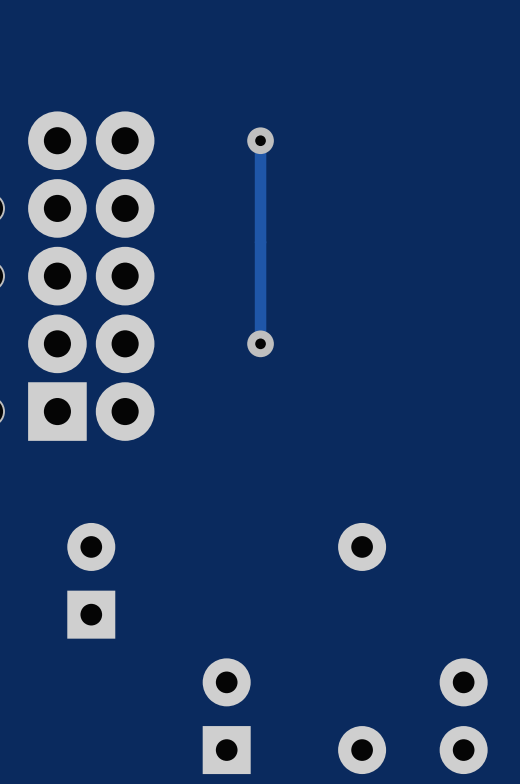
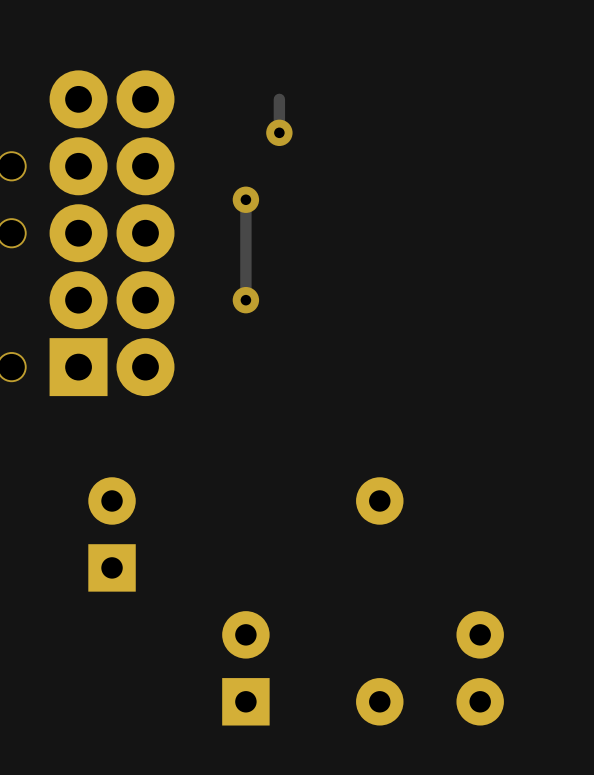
via position: (260, 140) -> (279, 132)
track: (260, 174) (260, 343) -> none
track: none -> (245, 199) (245, 300)
via: none -> (245, 199)
via position: (260, 343) -> (245, 300)

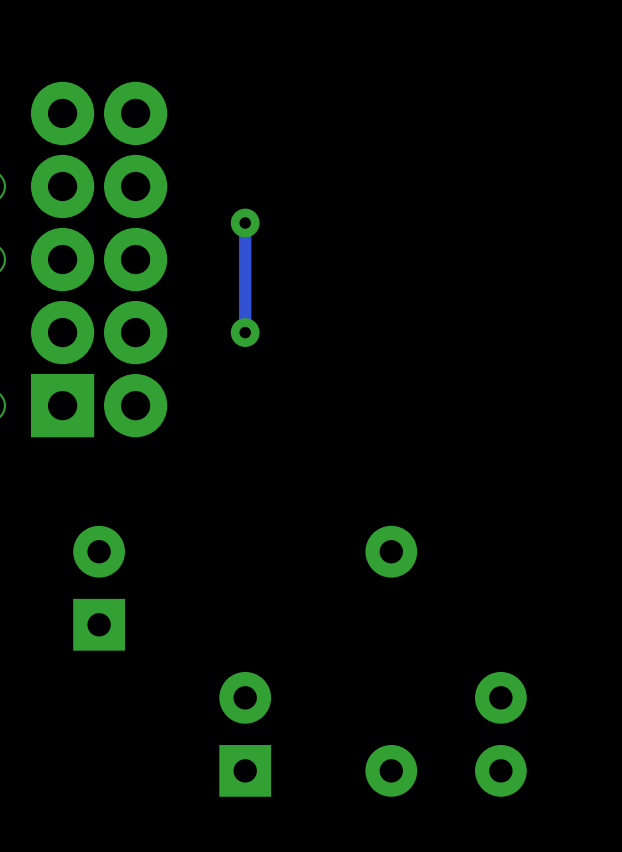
track: (279, 99) (279, 132) -> none
via: (279, 132) -> none

